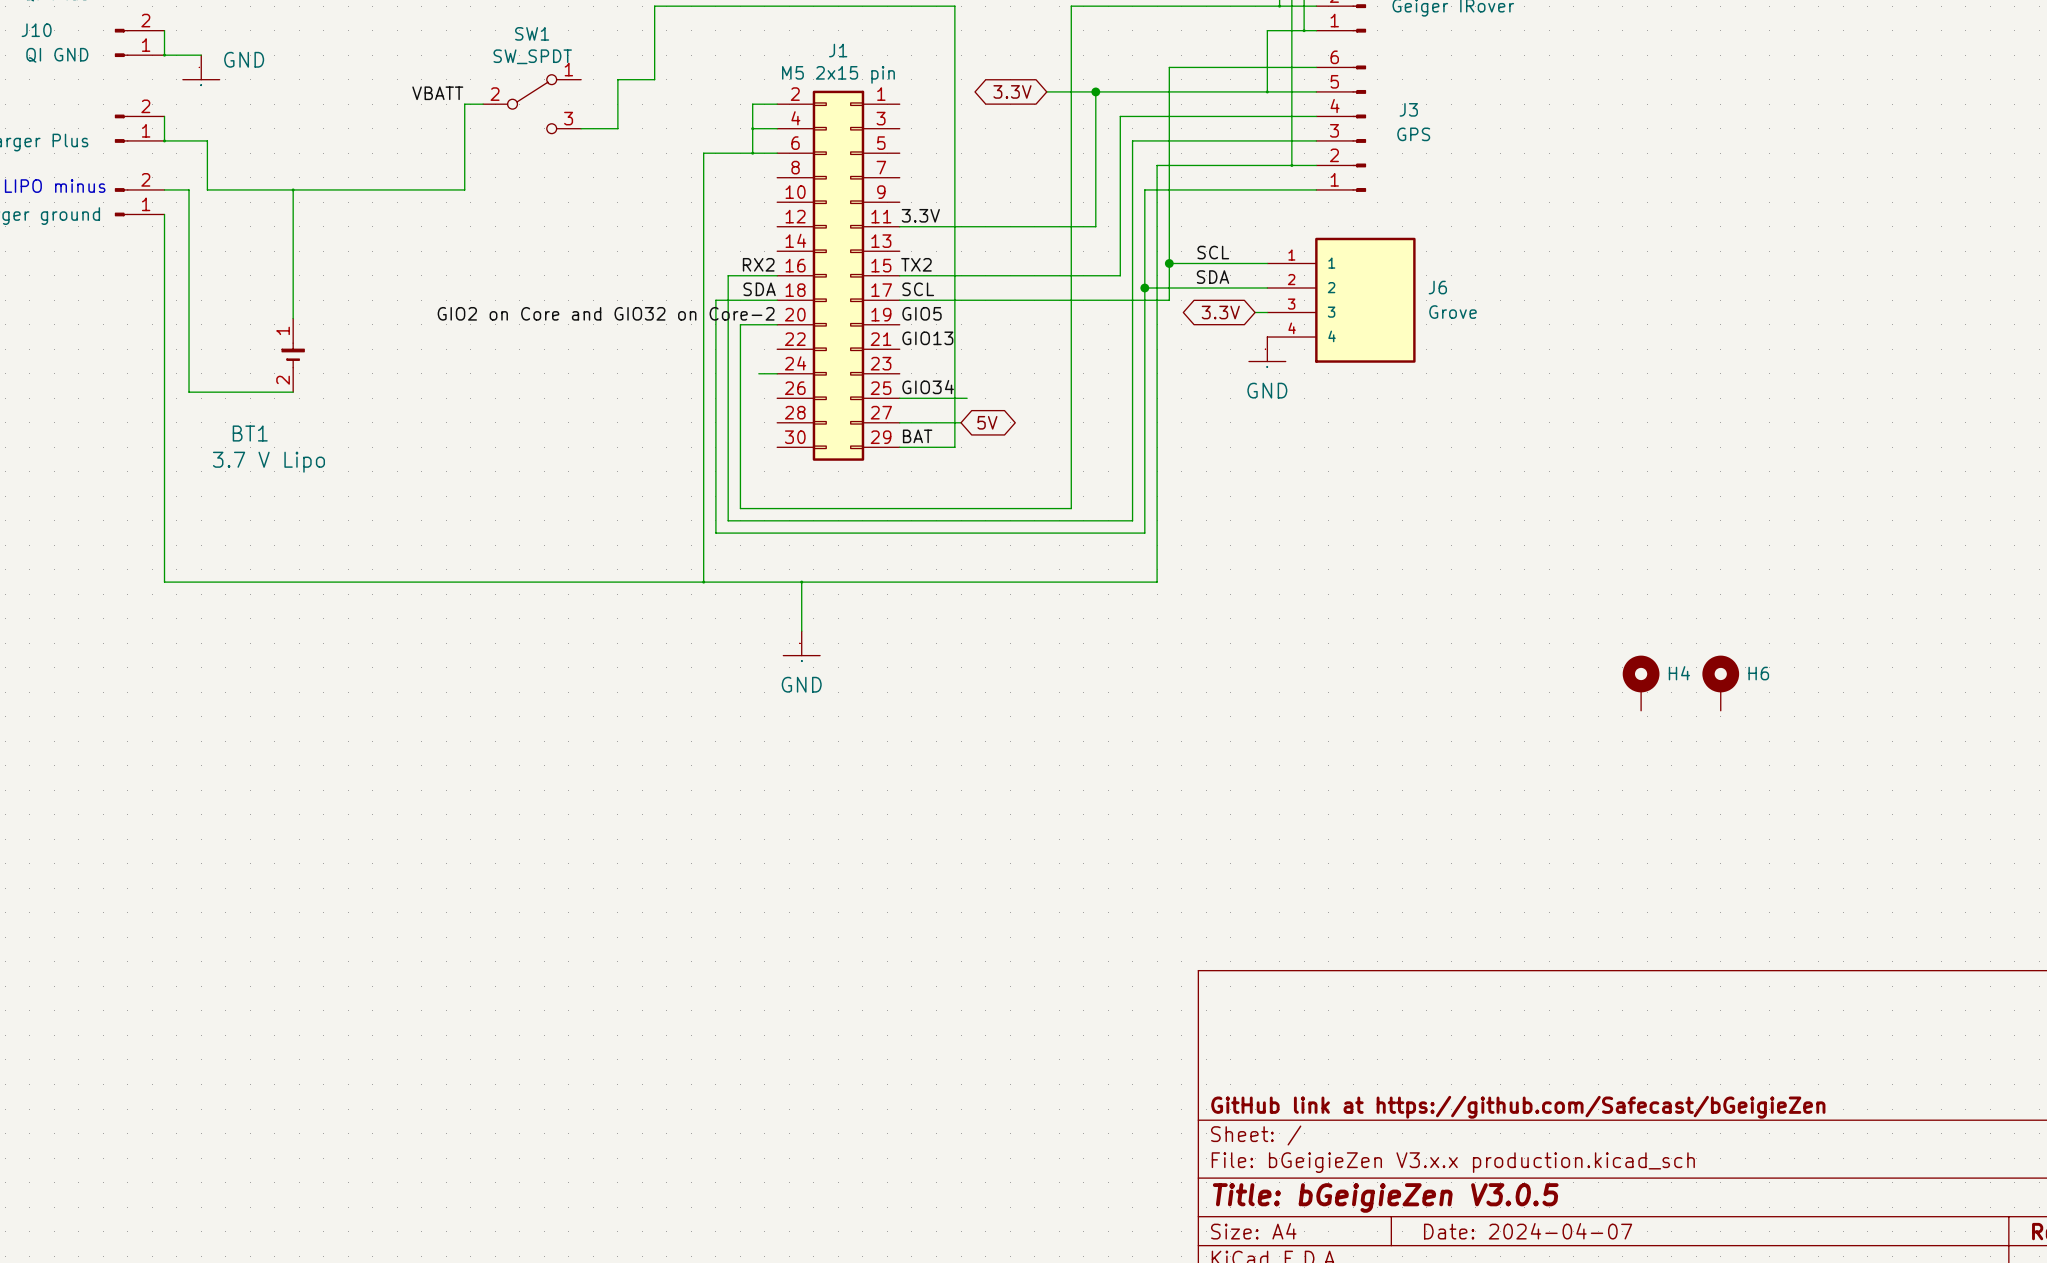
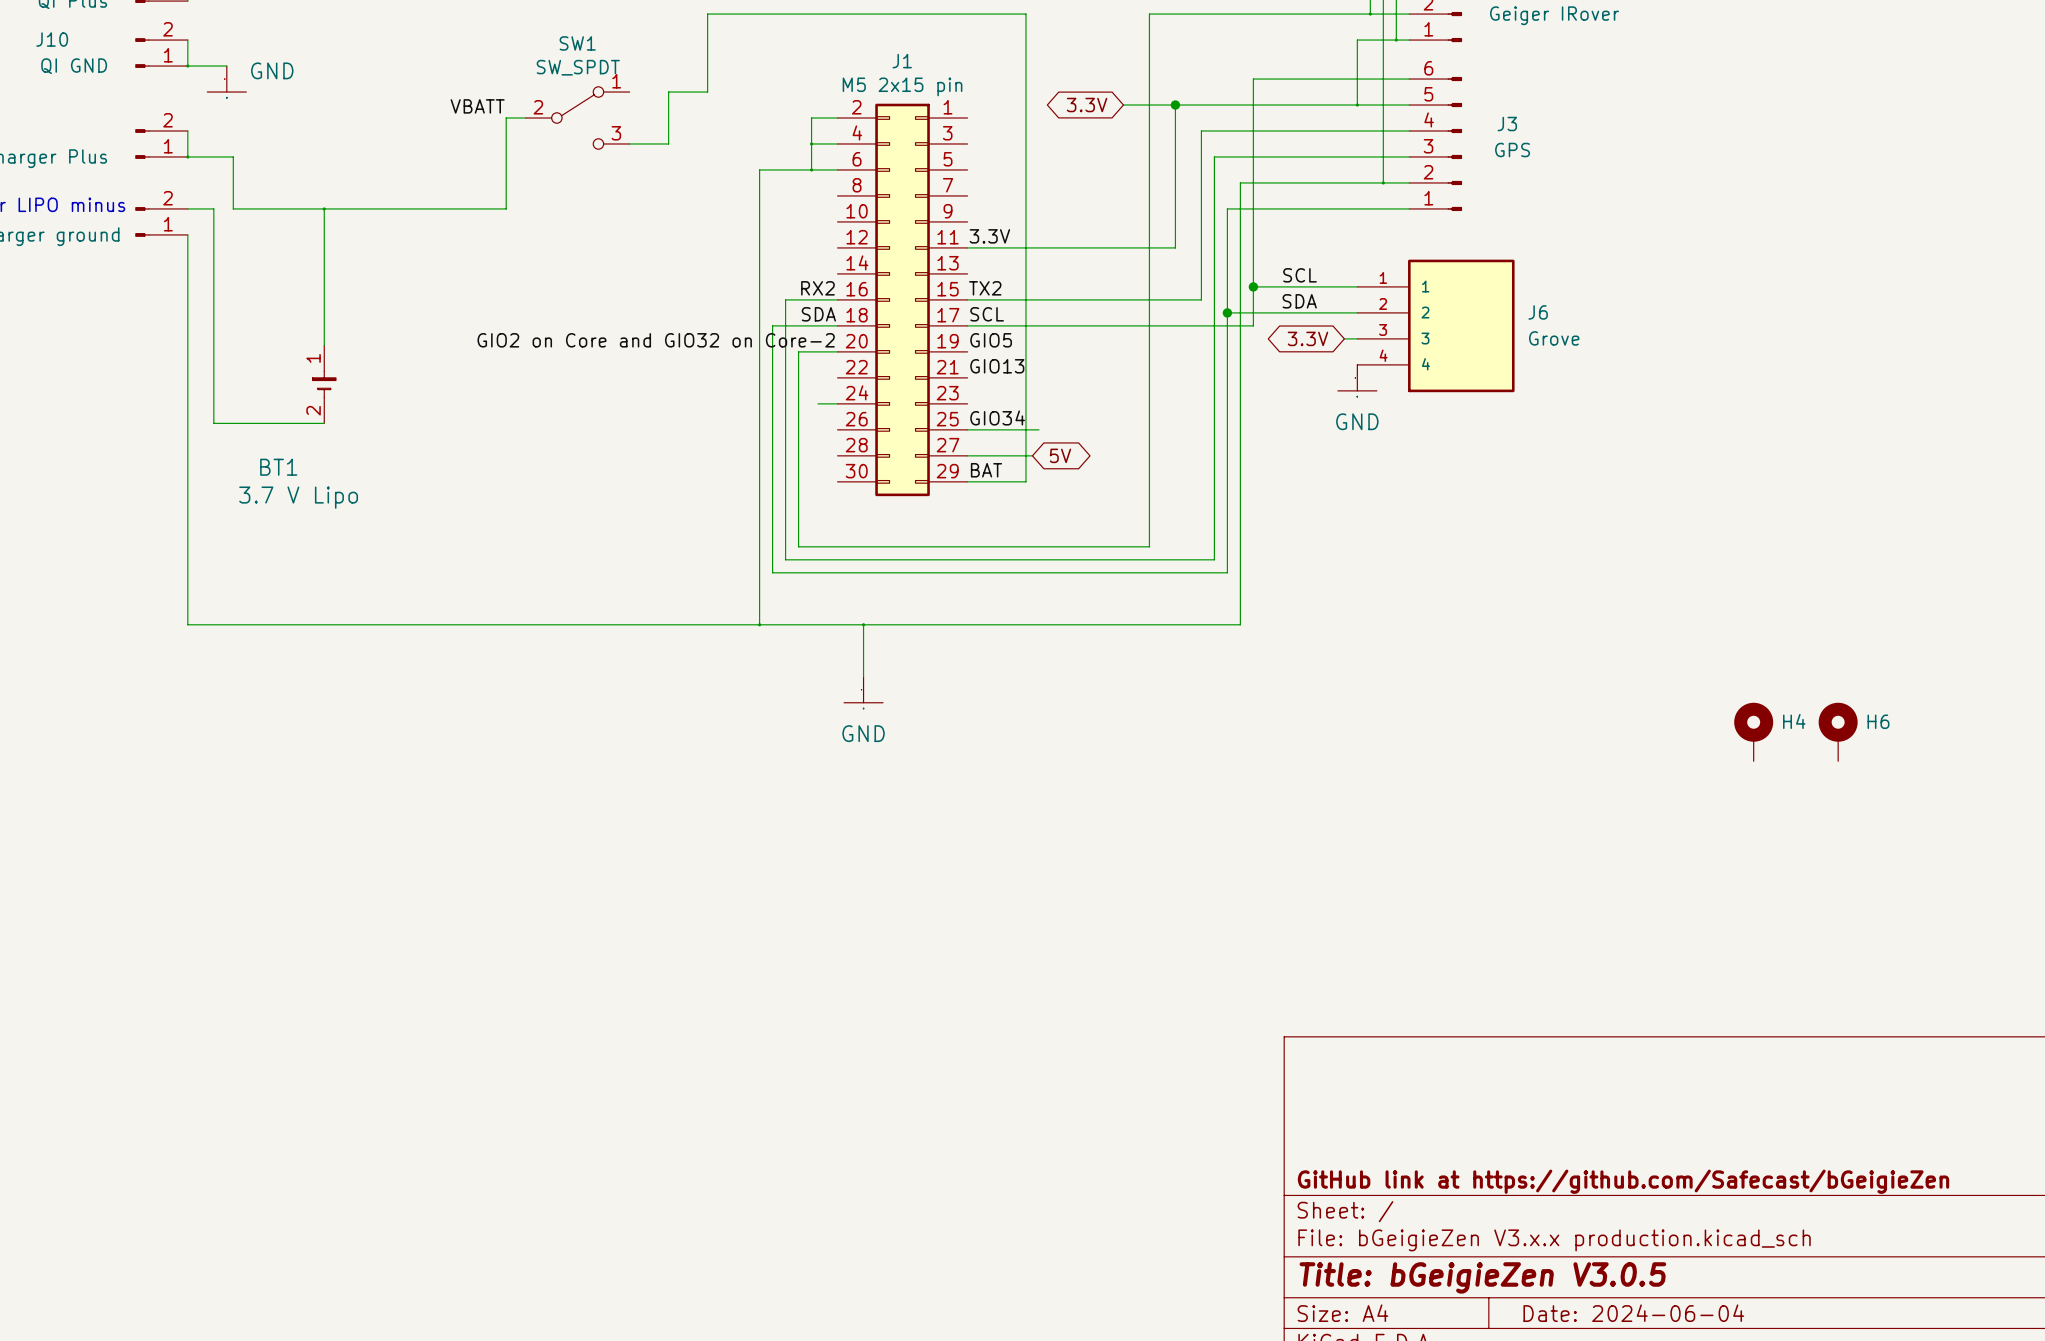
title block: Date: 2024-04-07 (1528, 1231) -> Date: 2024-06-04 (1633, 1313)

